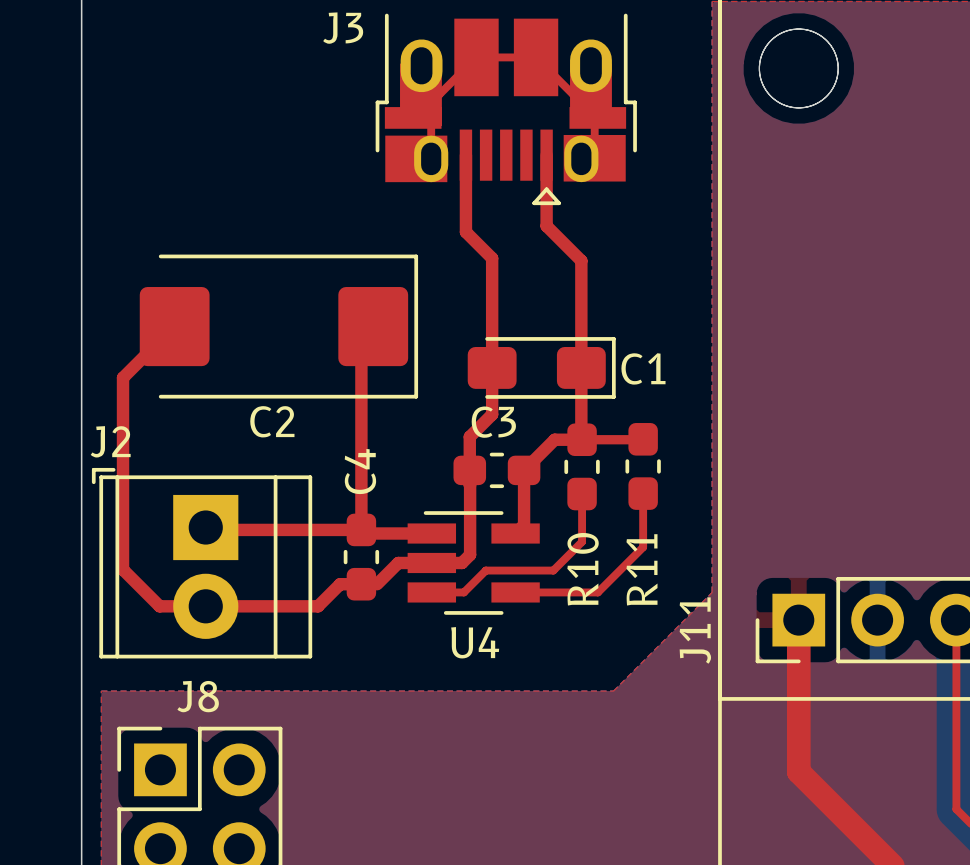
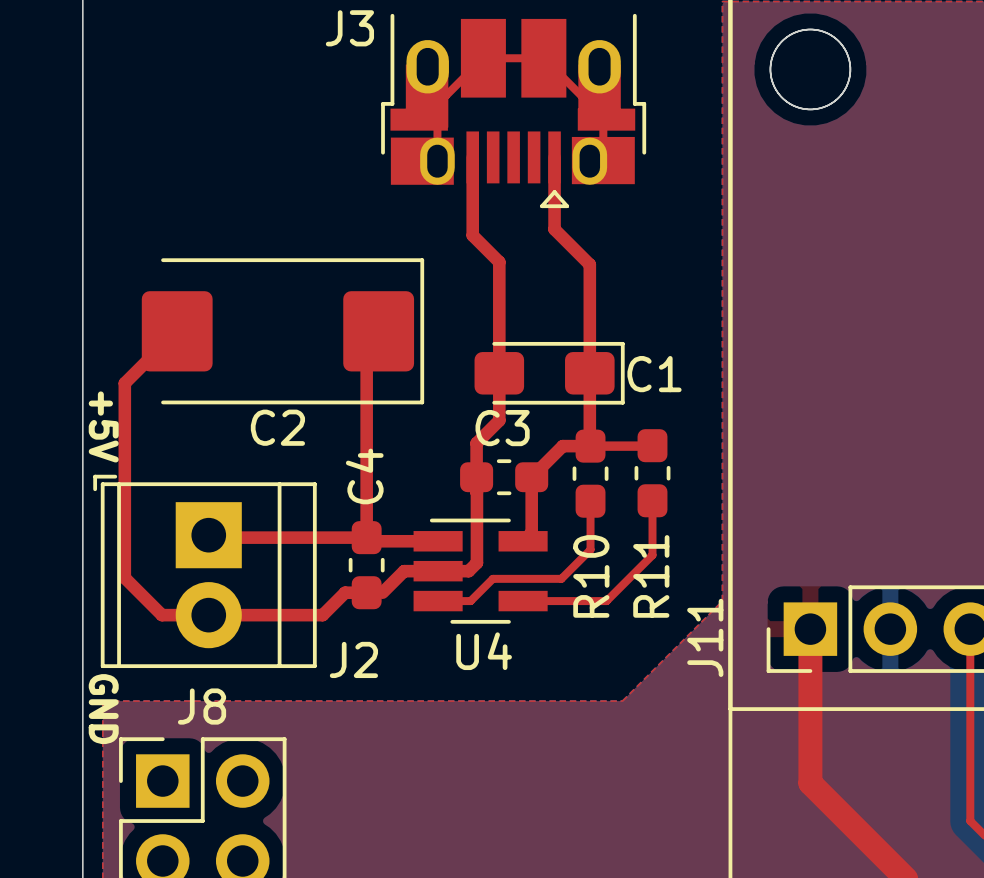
text: none -> +5V (103, 426)
J2 name position: J2 (110, 441) -> J2 (353, 659)
text: none -> GND (103, 709)

